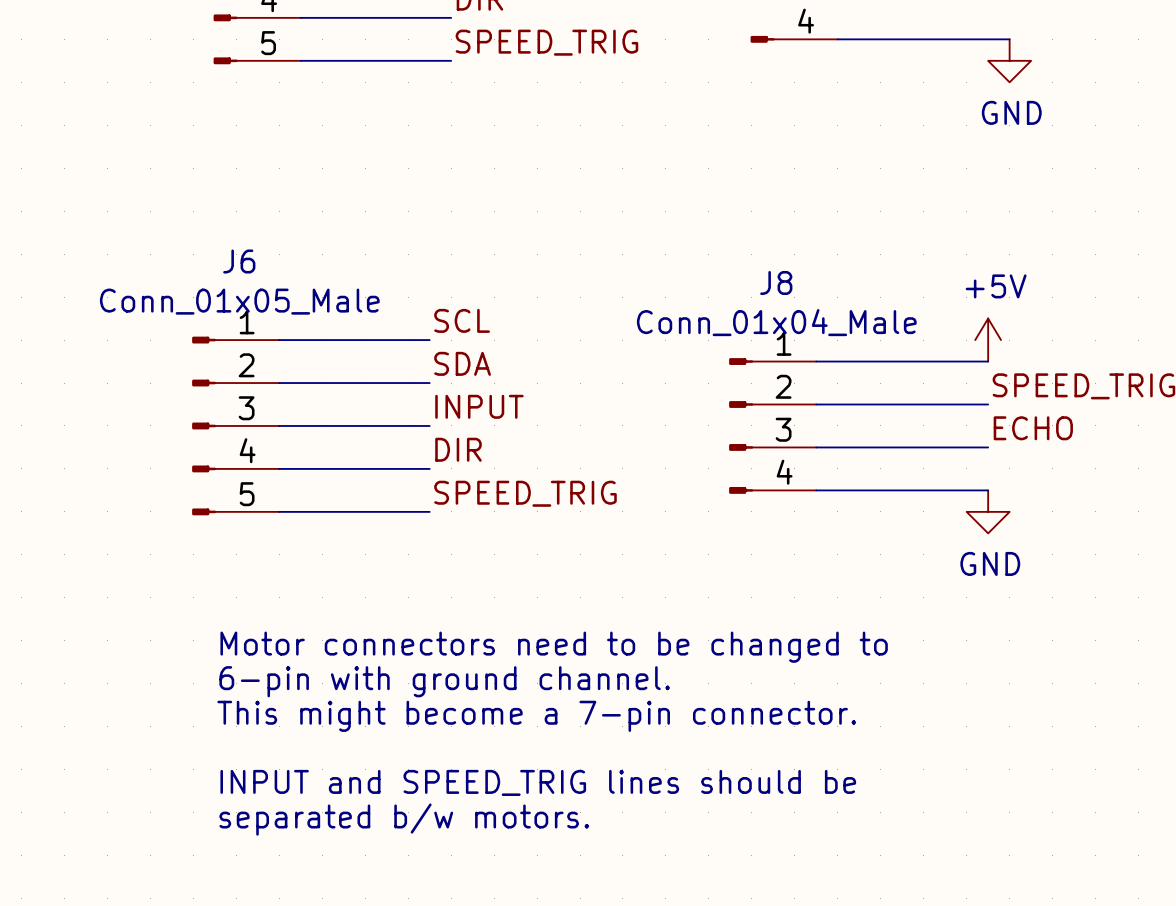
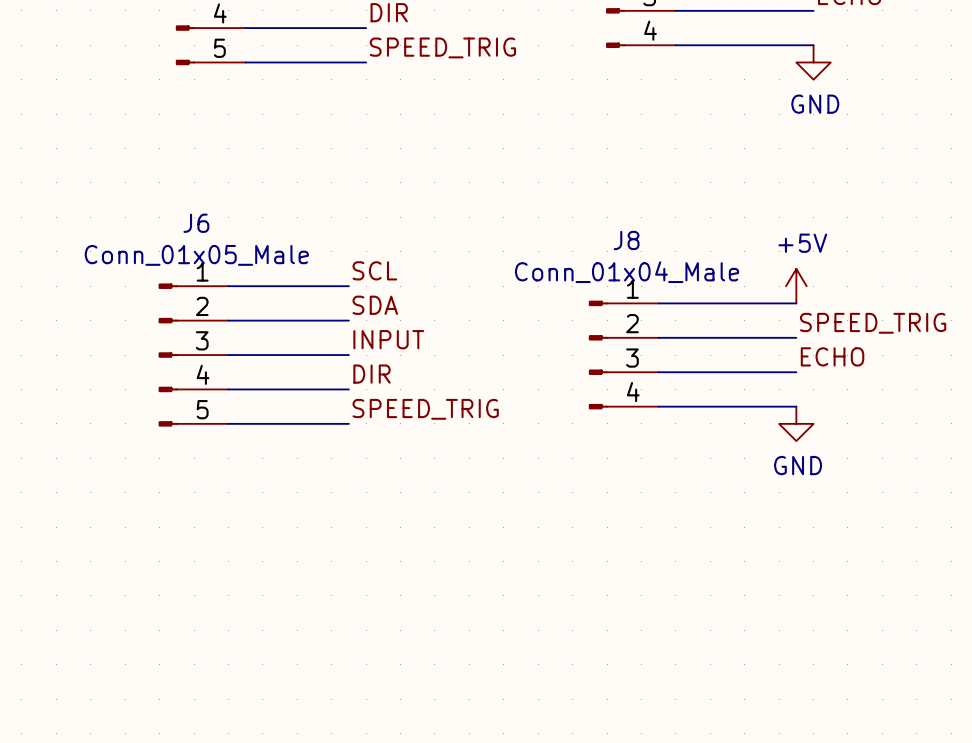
text: Motor connectors need to be changed to (554, 647) -> none
text: 6-pin with ground channel. (444, 681) -> none
text: This might become a 7-pin connector. (536, 716) -> none
text: INPUT and SPEED_TRIG lines should be (538, 782) -> none
text: separated b/w motors. (404, 819) -> none

